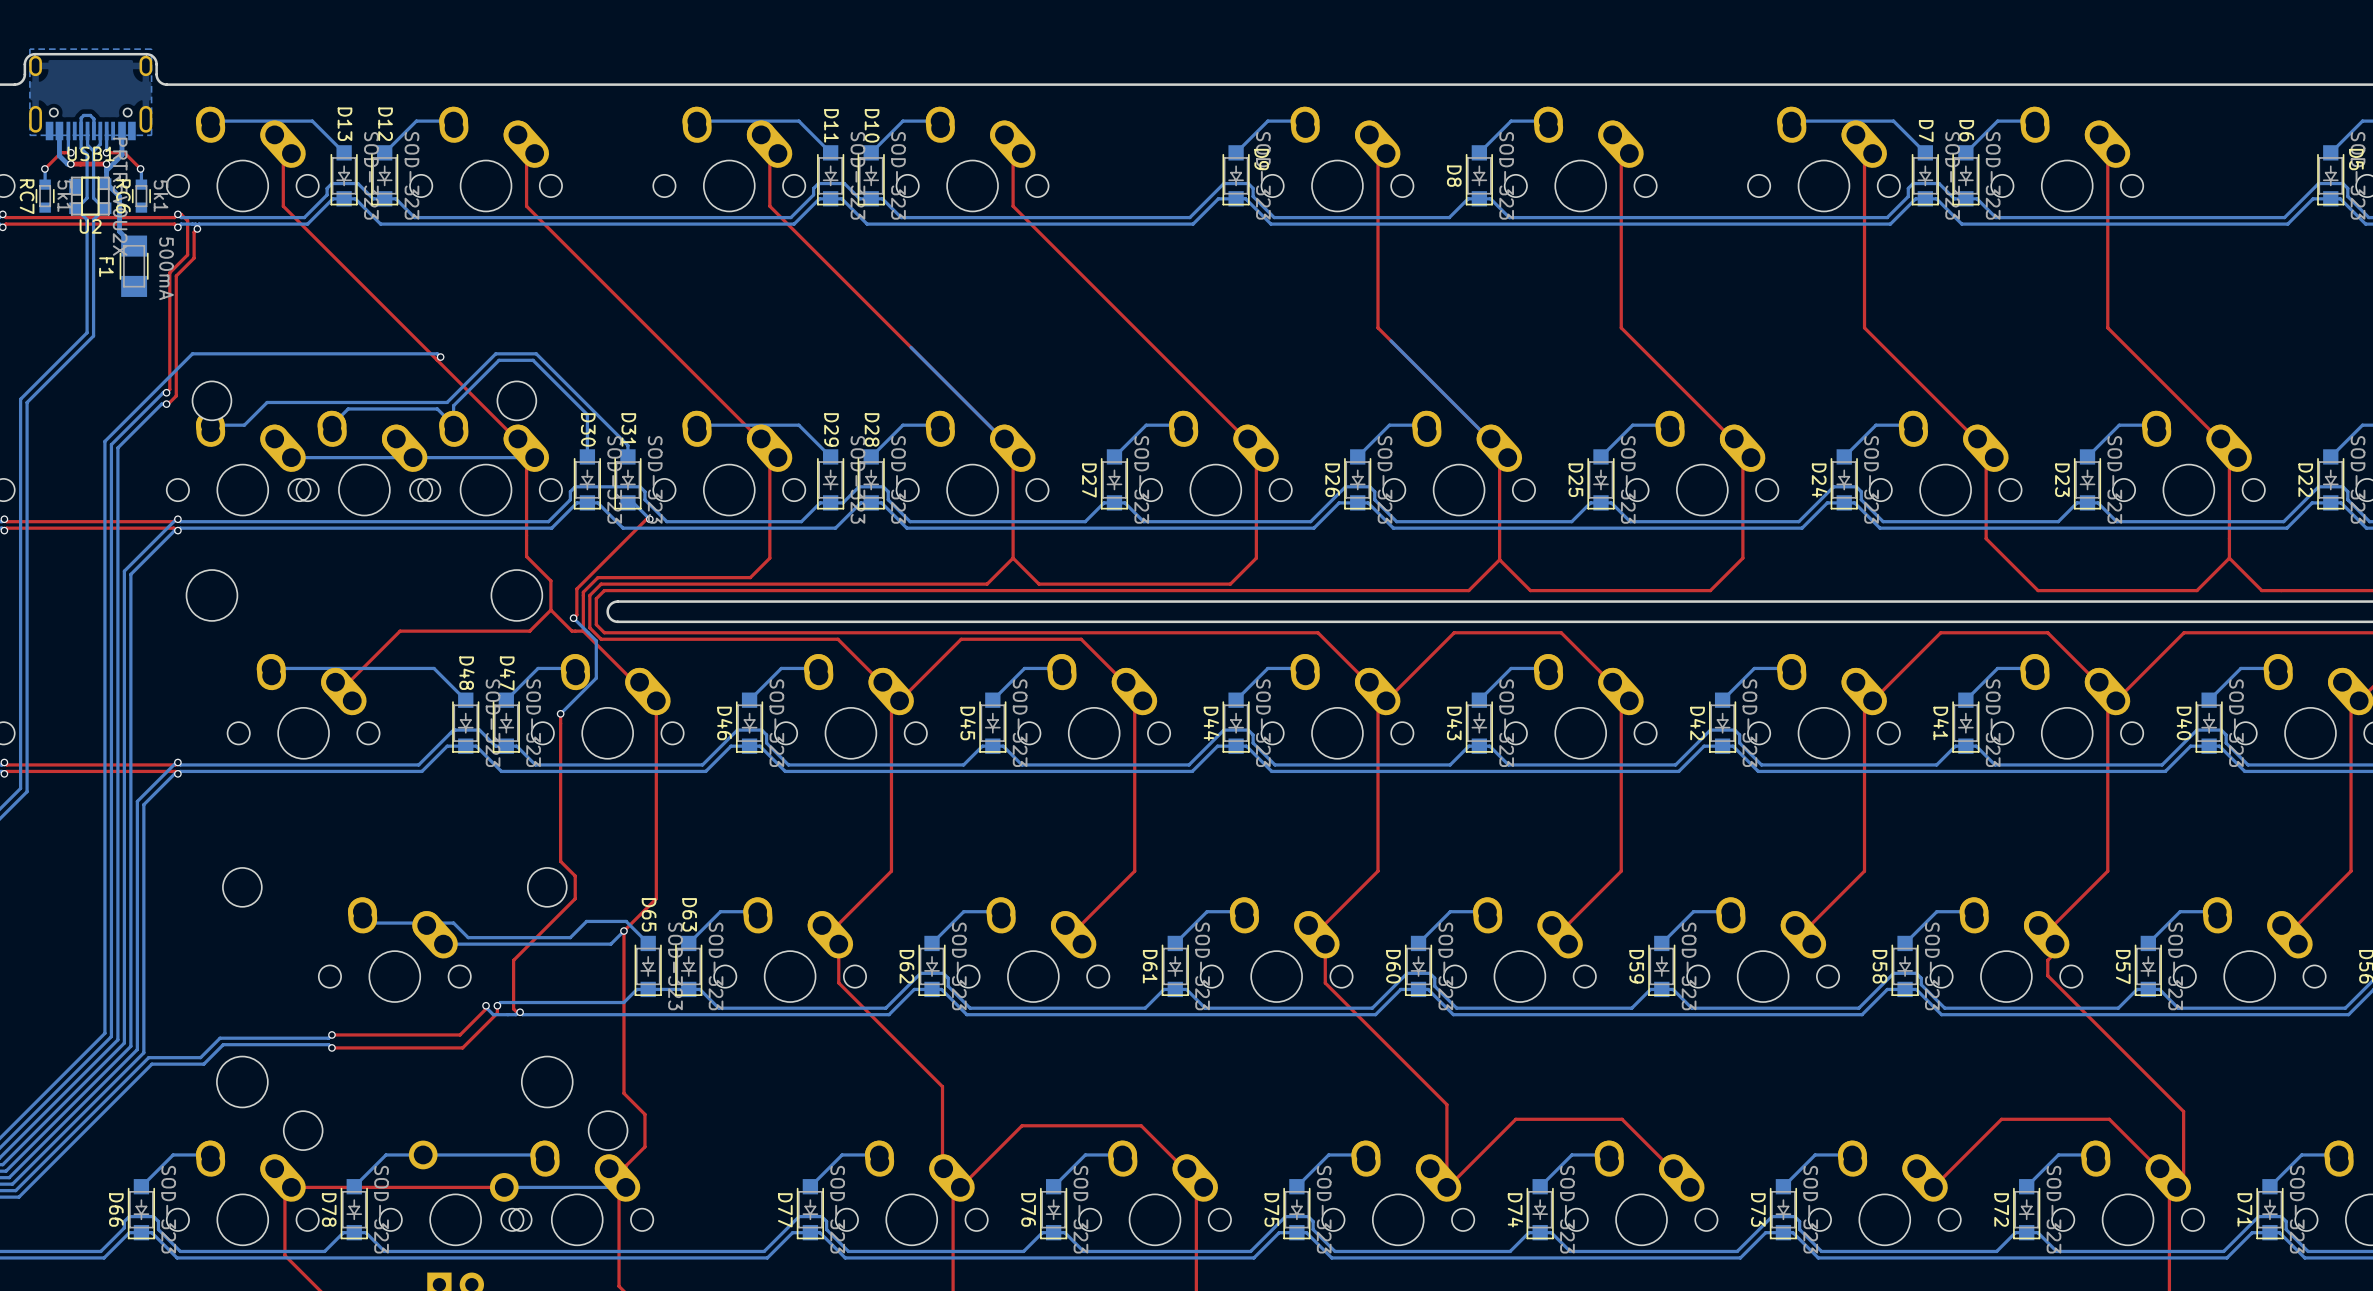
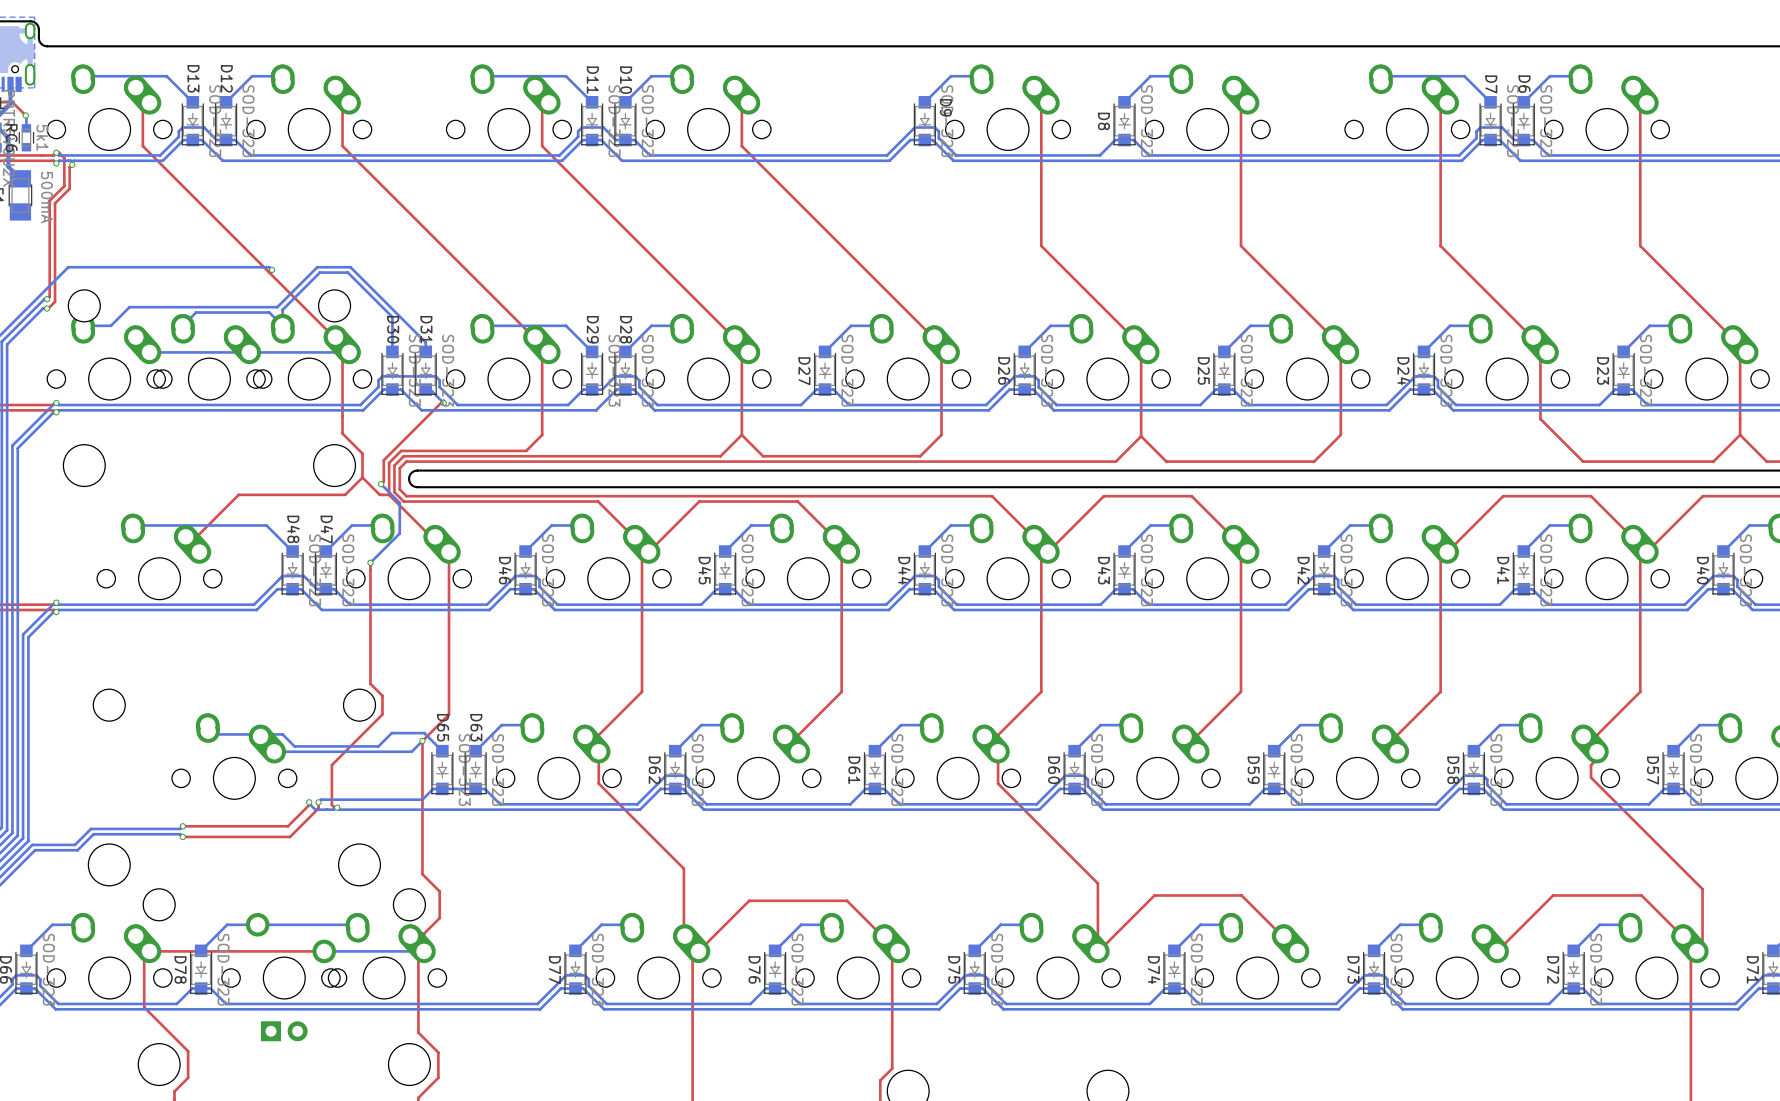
bottom track: (1390, 340) (1507, 457) -> none
bottom track: (910, 347) (1021, 457) -> none

